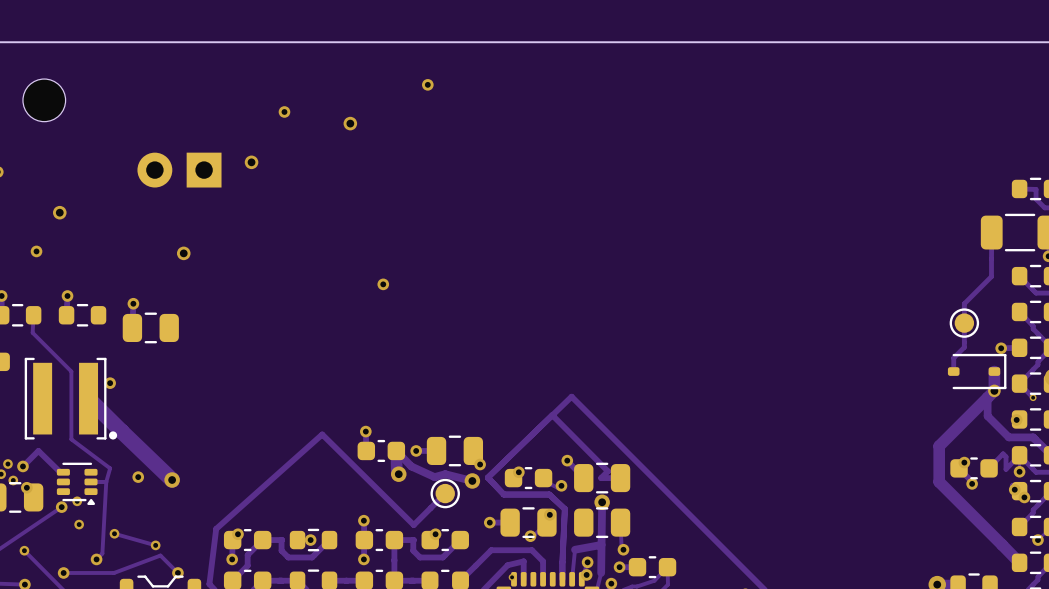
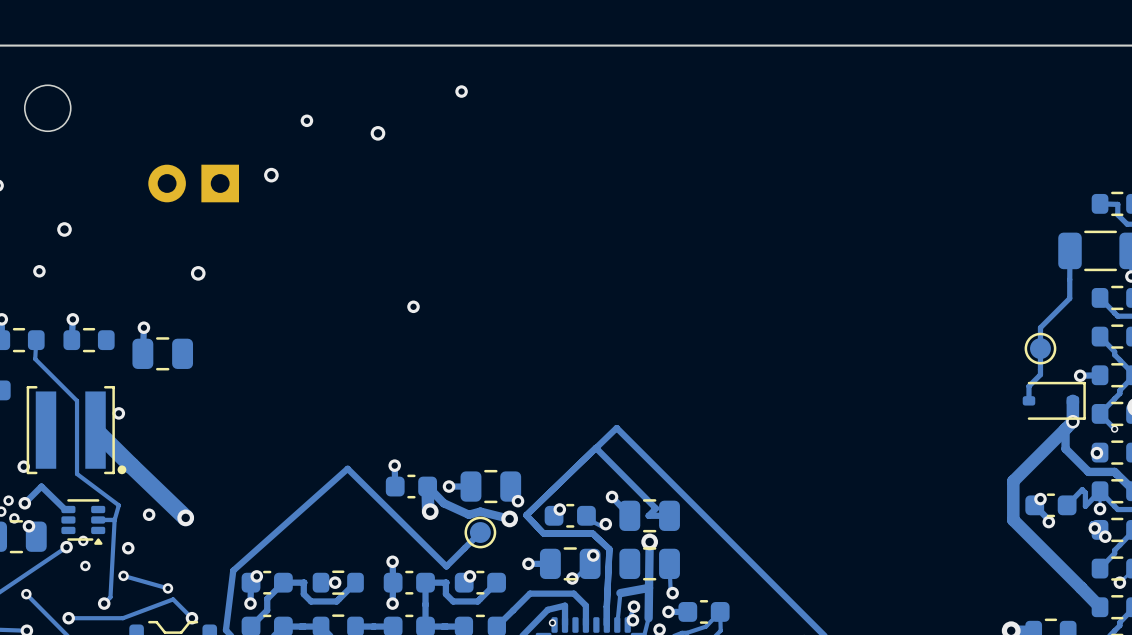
via: none -> (23, 466)
via: none -> (128, 548)

